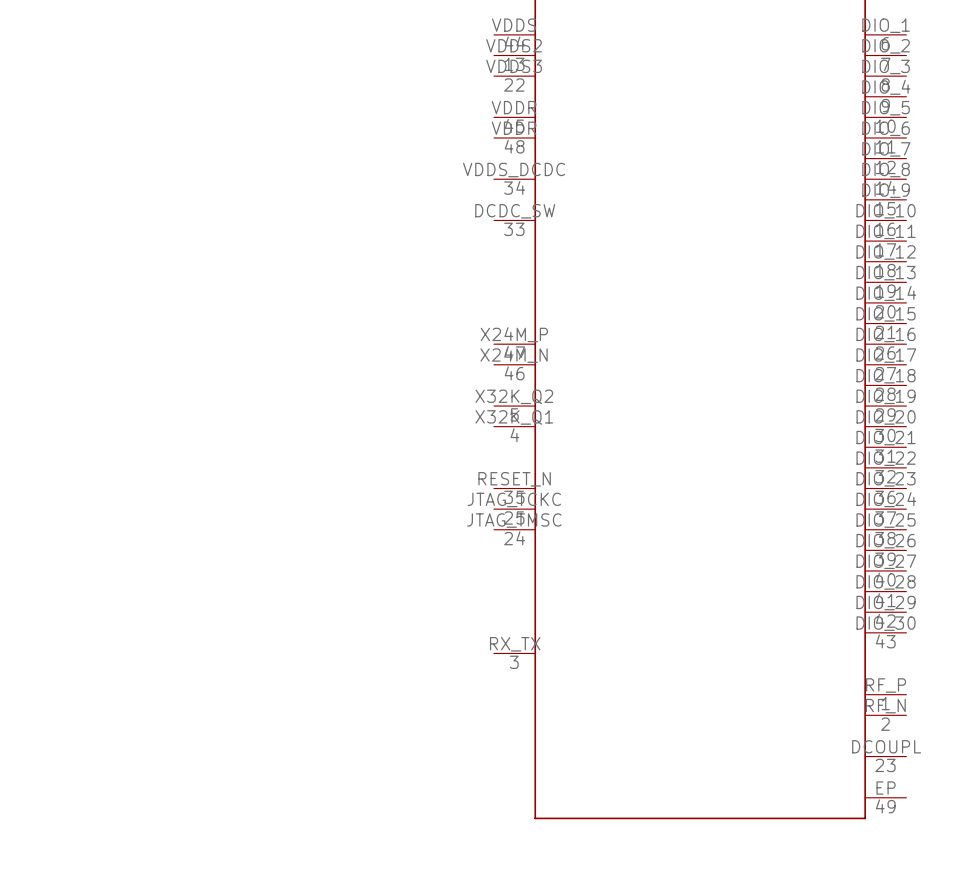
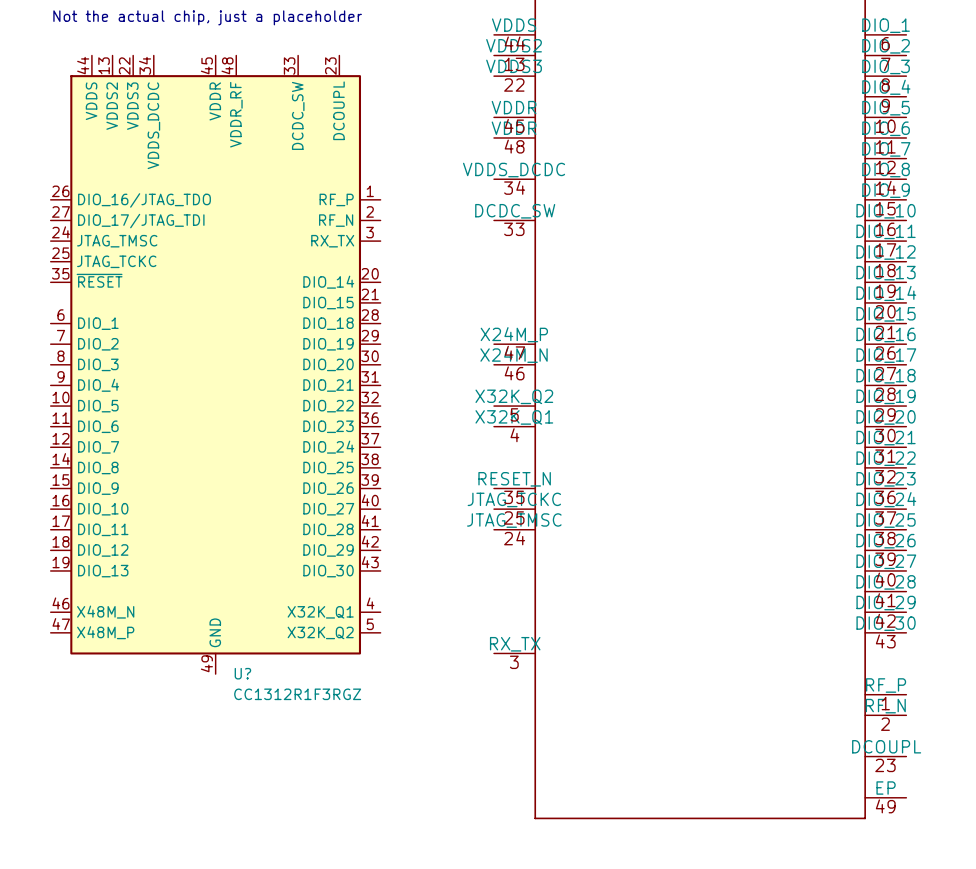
text: none -> Not the actual chip, just a placeholder (207, 17)
U?: none -> CC1312R1F3RGZ (215, 364)

